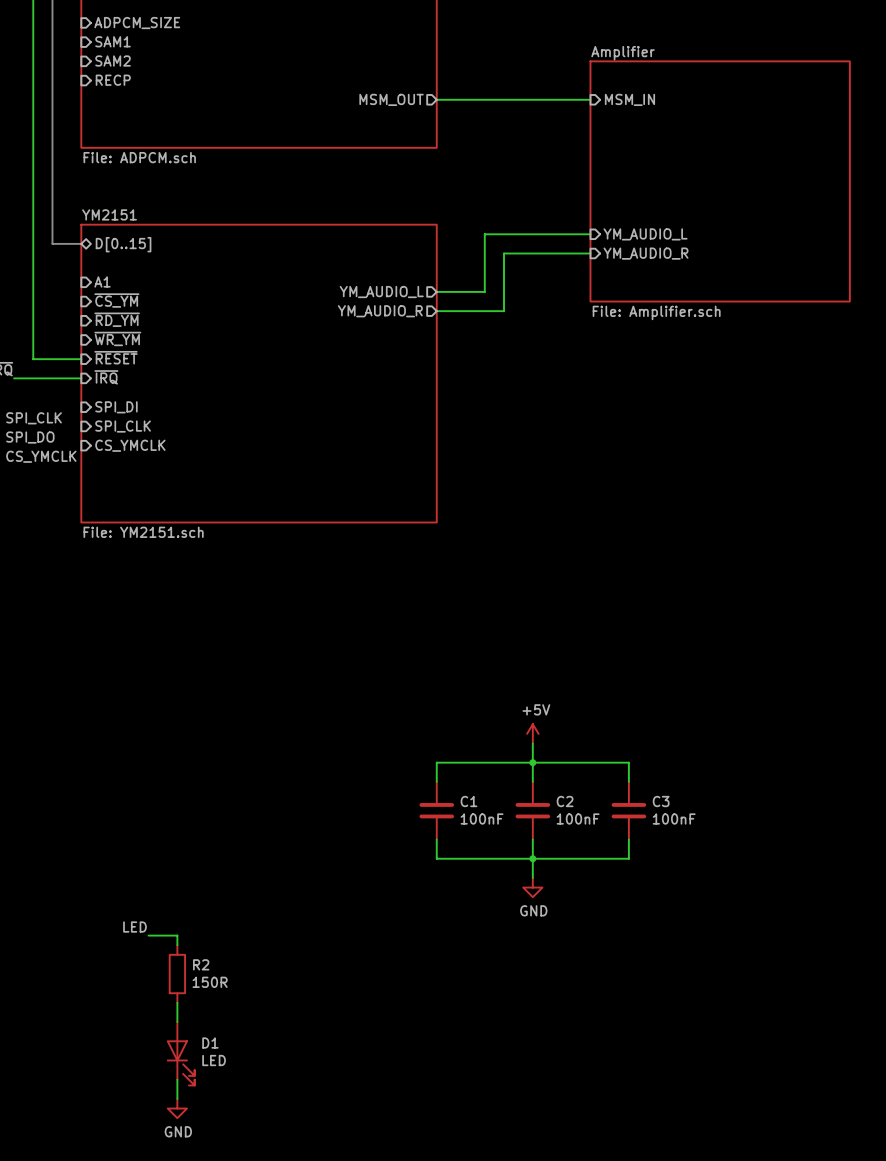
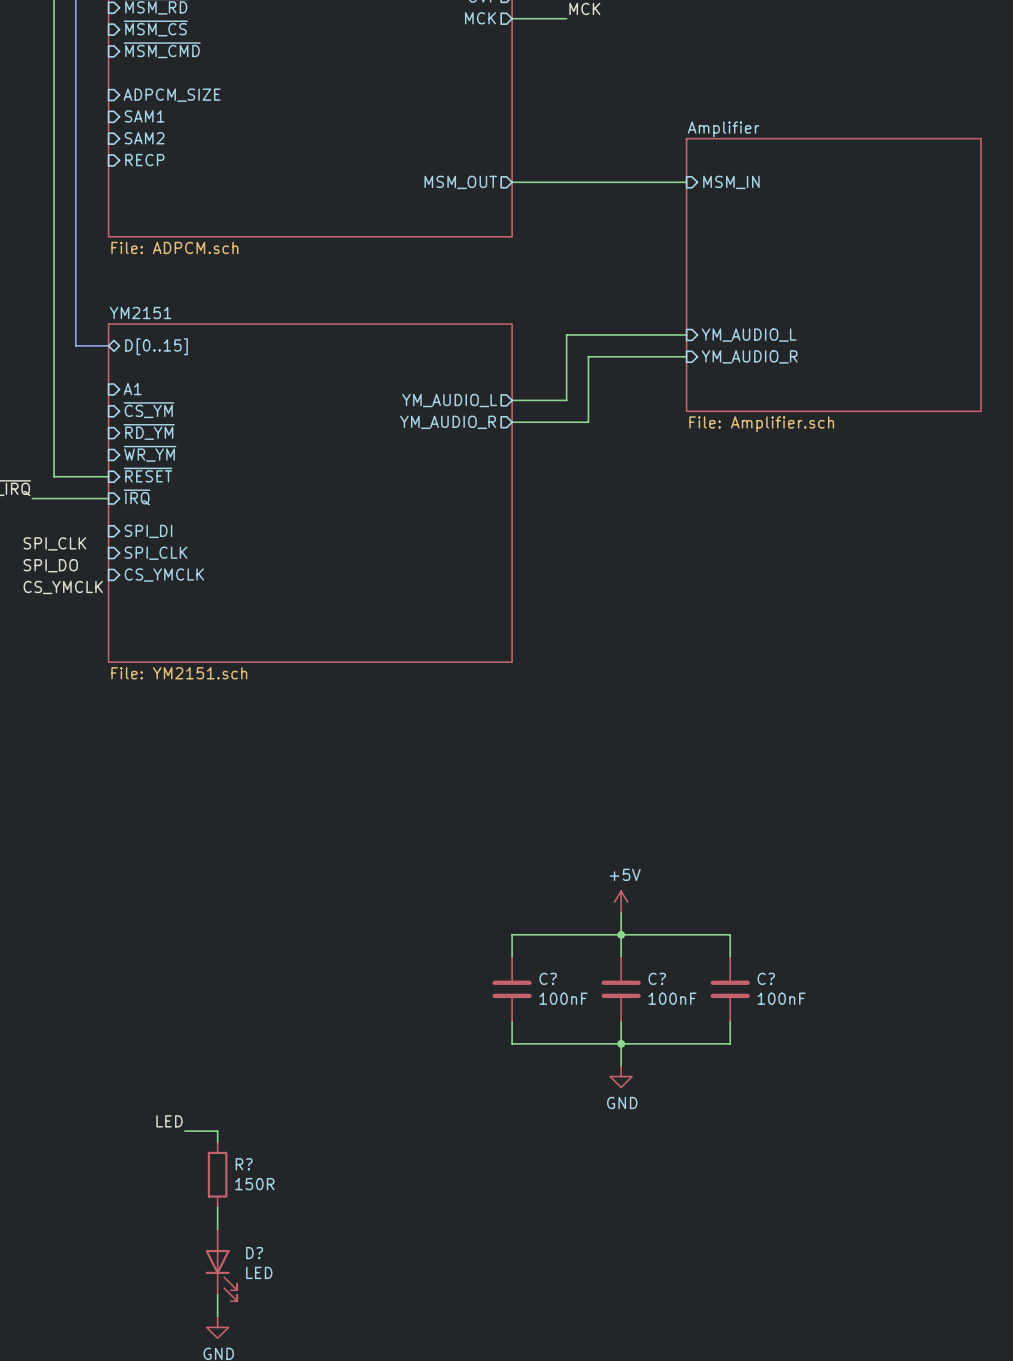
C1 name: C1 (468, 801) -> C? (548, 978)
C2 name: C2 (565, 801) -> C? (657, 978)
C3 name: C3 (661, 801) -> C? (766, 978)
R2 name: R2 (201, 964) -> R? (244, 1164)
D1 name: D1 (210, 1043) -> D? (254, 1253)

